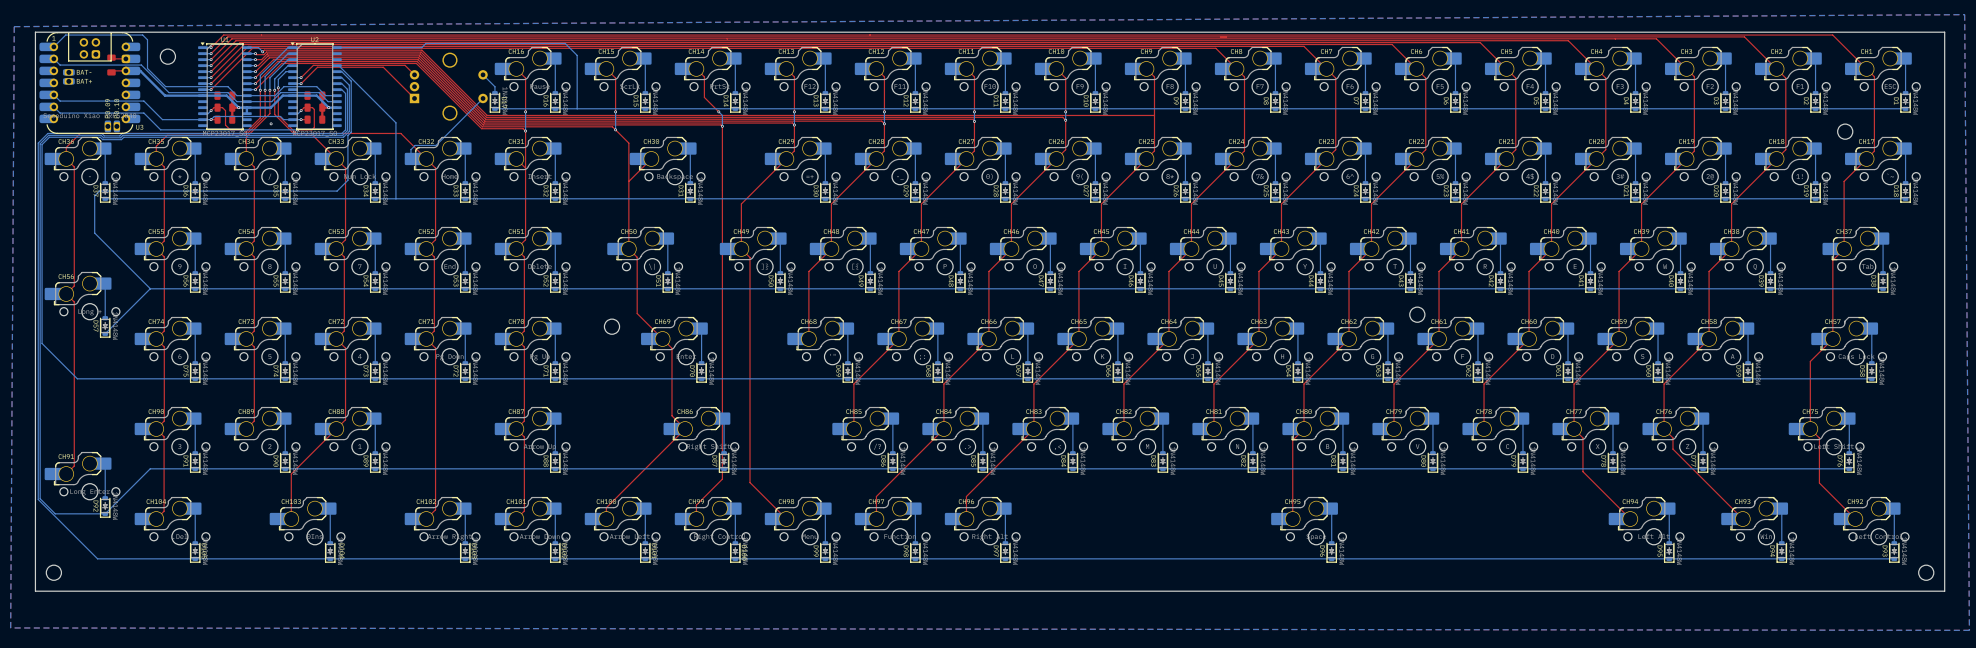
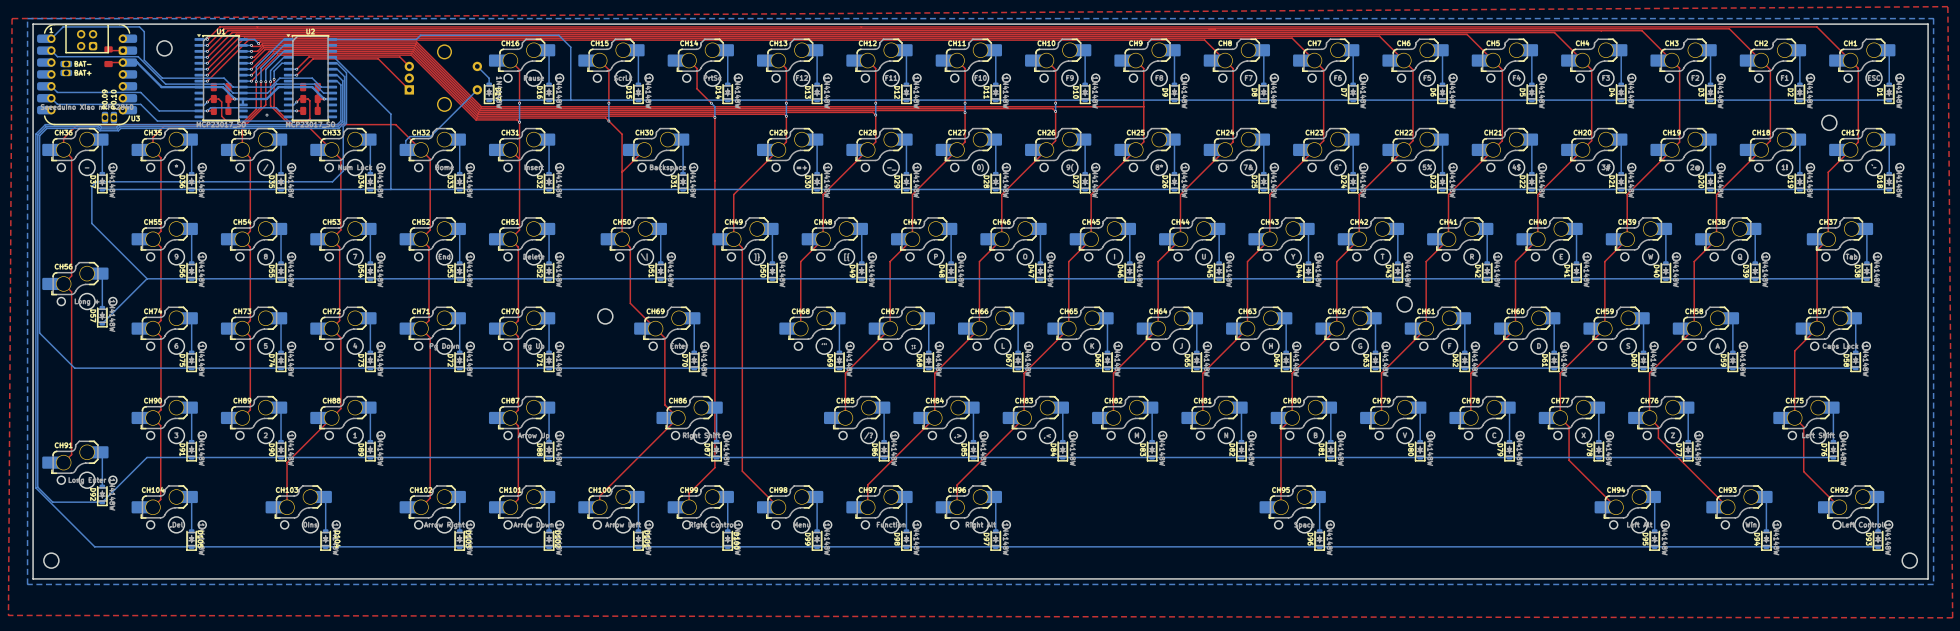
bottom zone outline: (1964, 14) (14, 26) (10, 627) (1969, 630) (1964, 14) -> (1933, 18) (1933, 584) (27, 584) (27, 18) (1933, 18)

